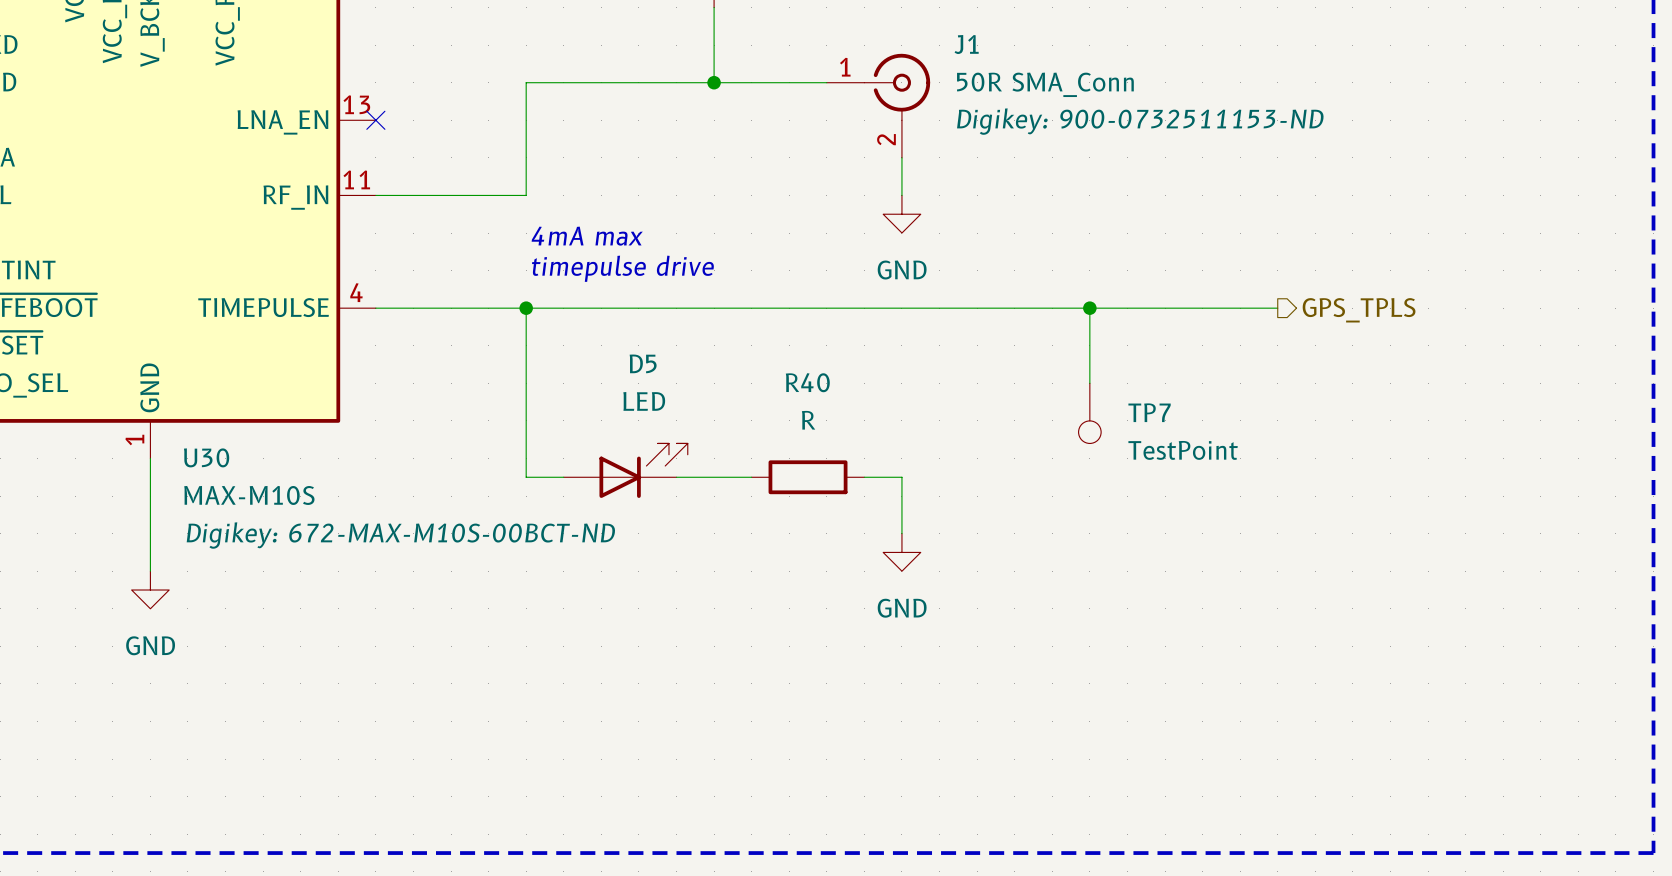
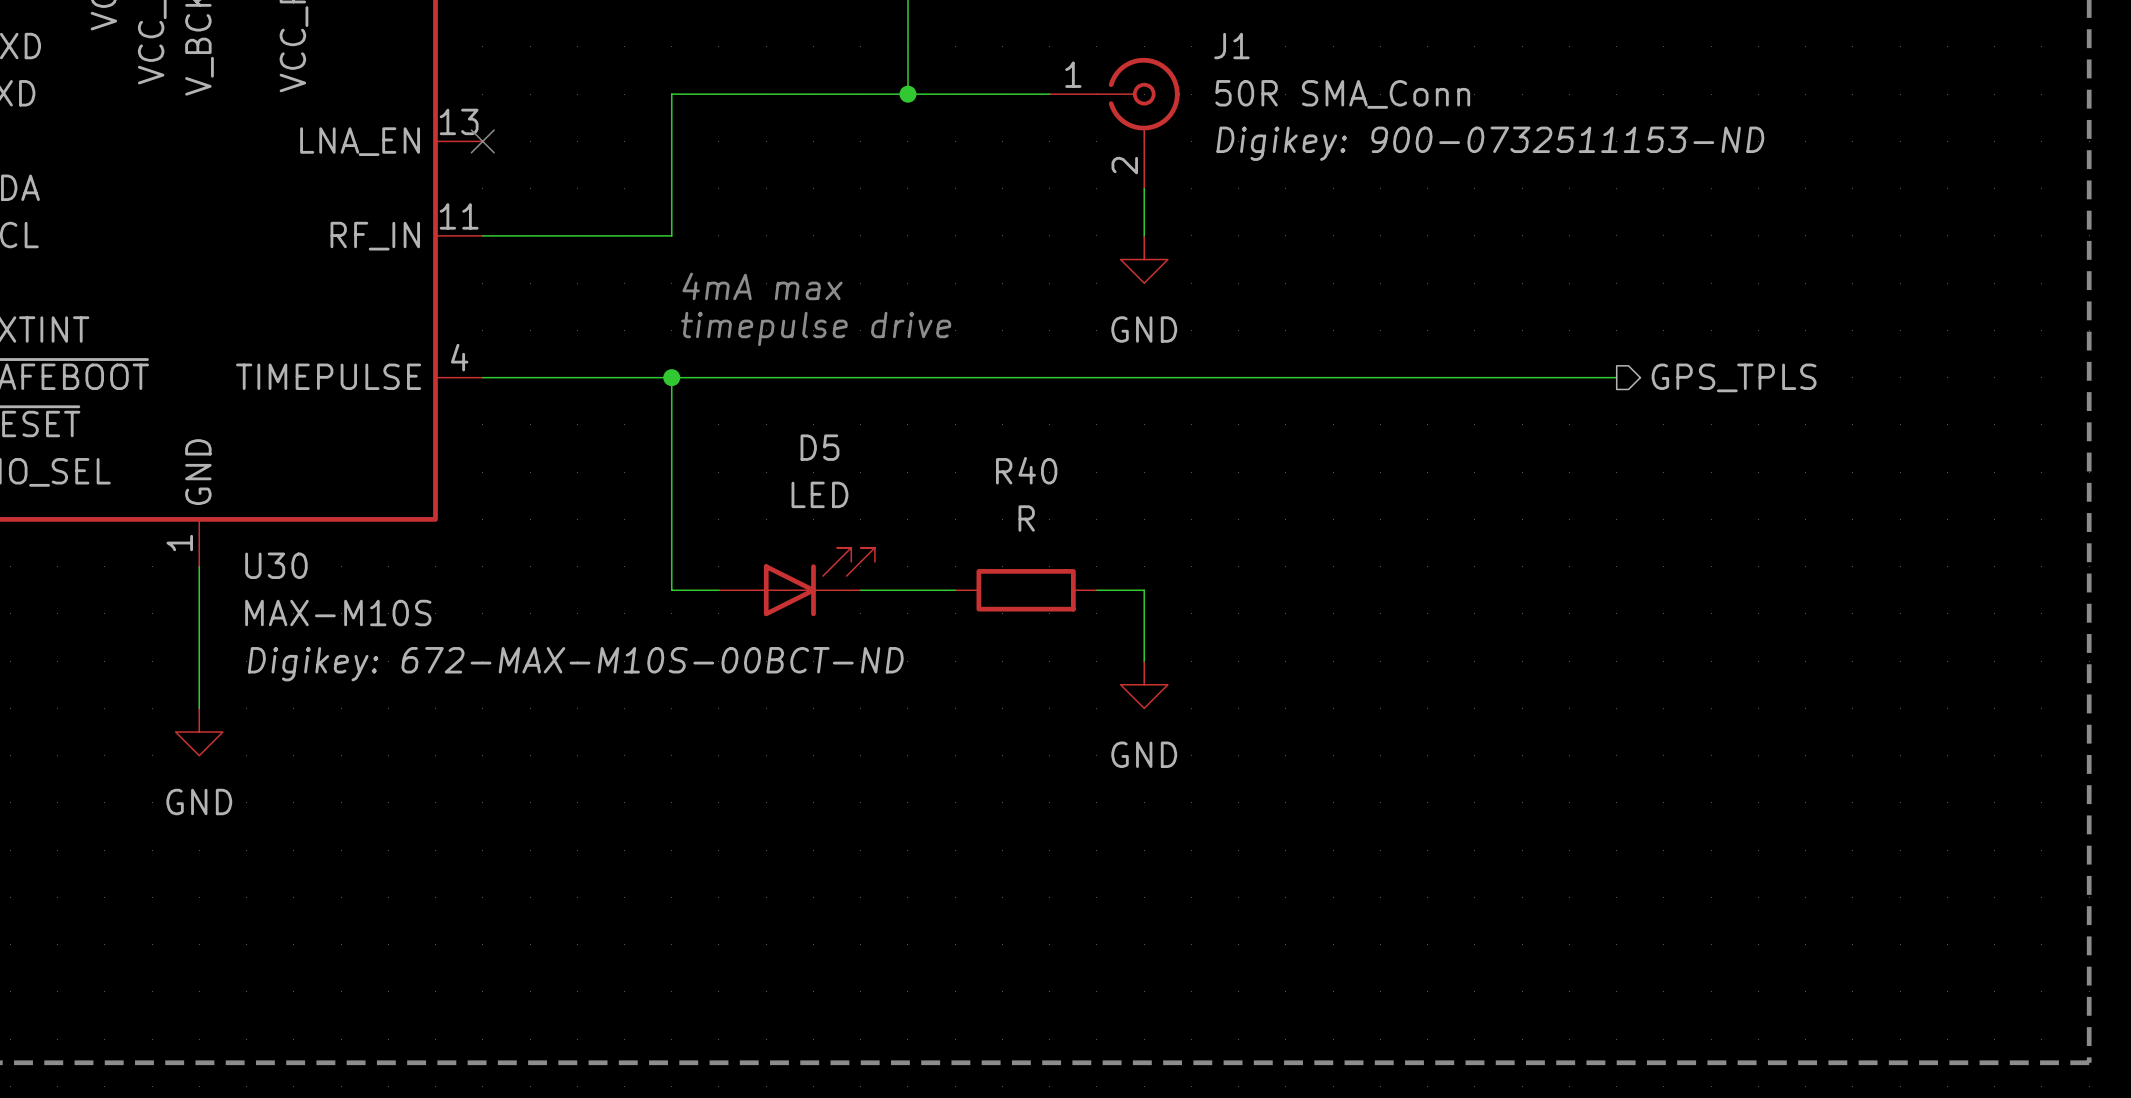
wire: (1089, 308) (1089, 383) -> none
junction: (1089, 308) -> none
TP7: TestPoint (1089, 413) -> none

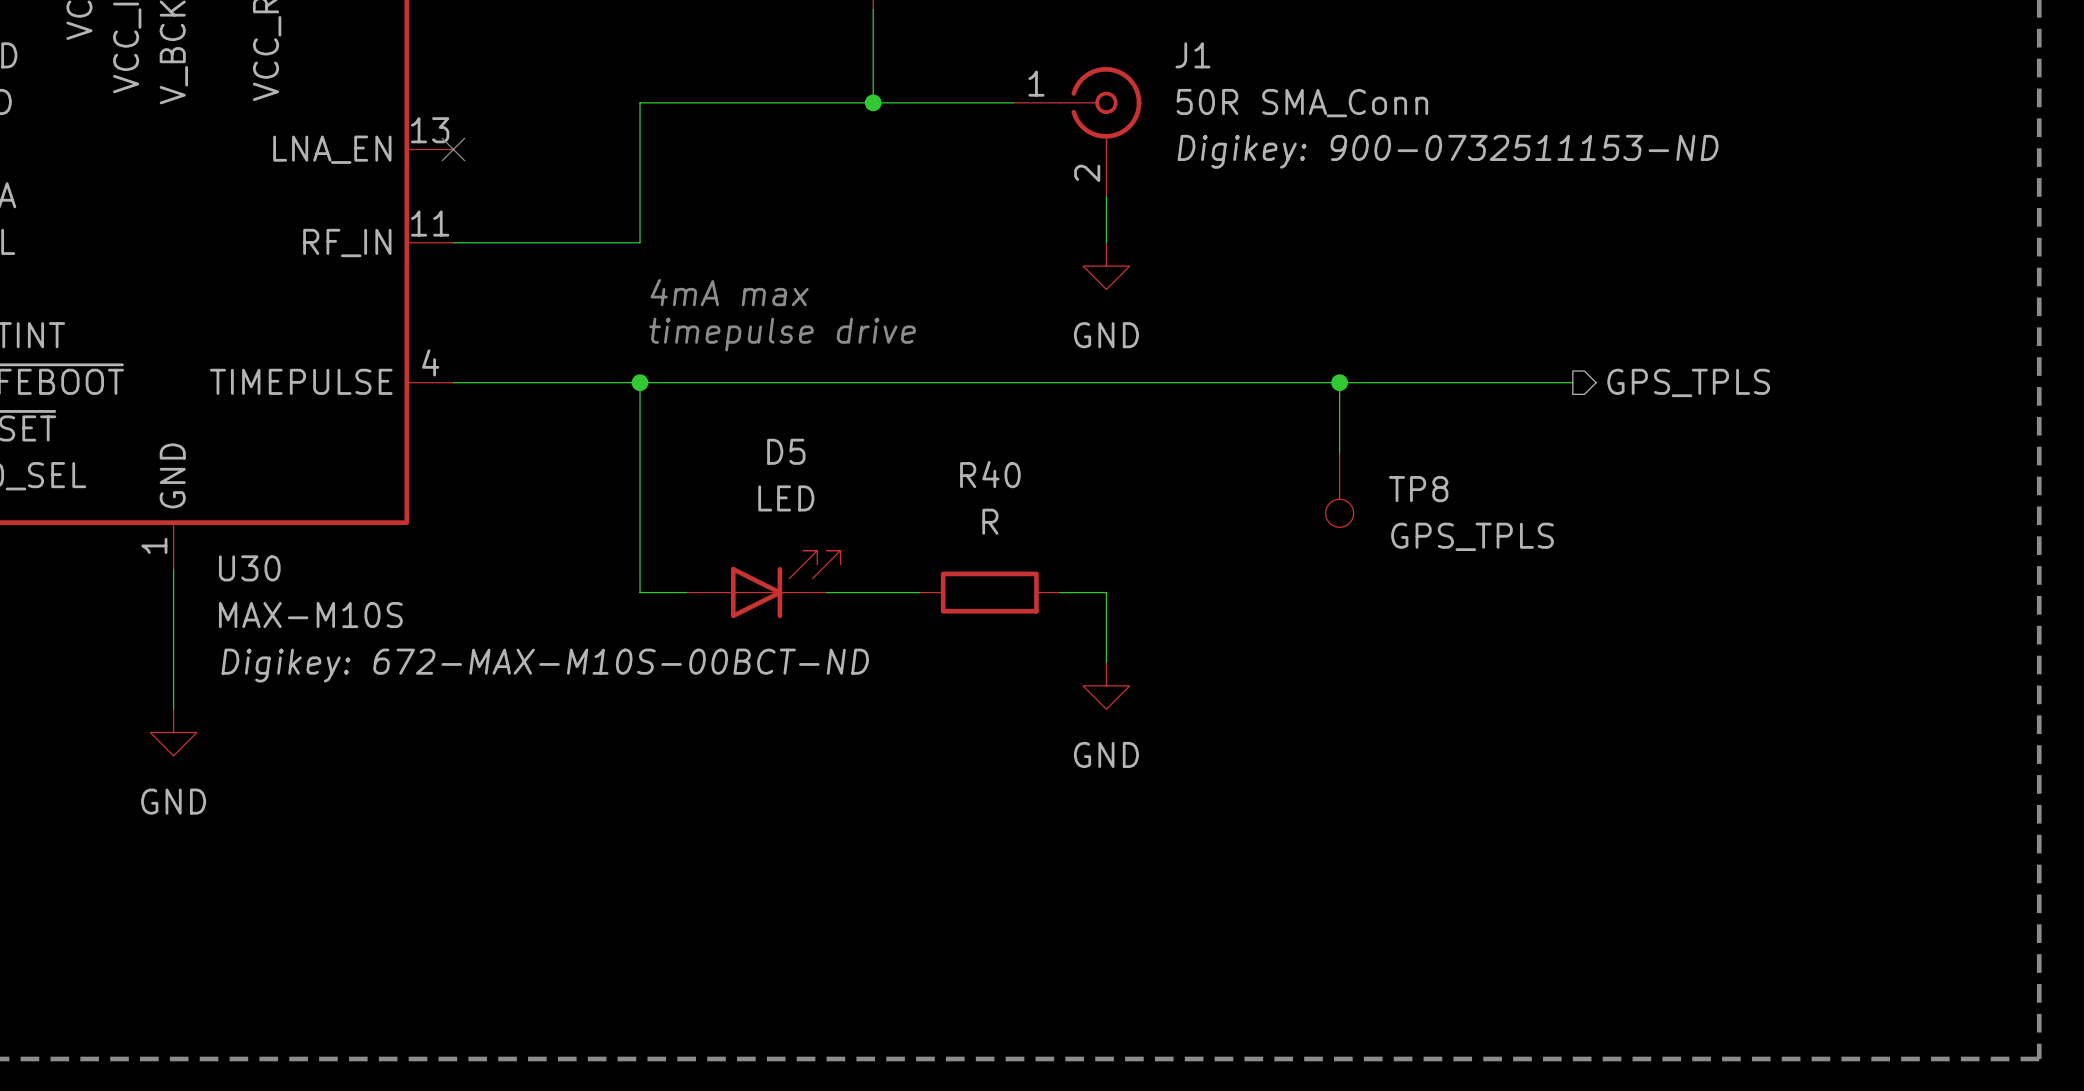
wire: none -> (1339, 382) (1339, 452)
junction: none -> (1339, 382)
TP8: none -> GPS_TPLS (1339, 489)

